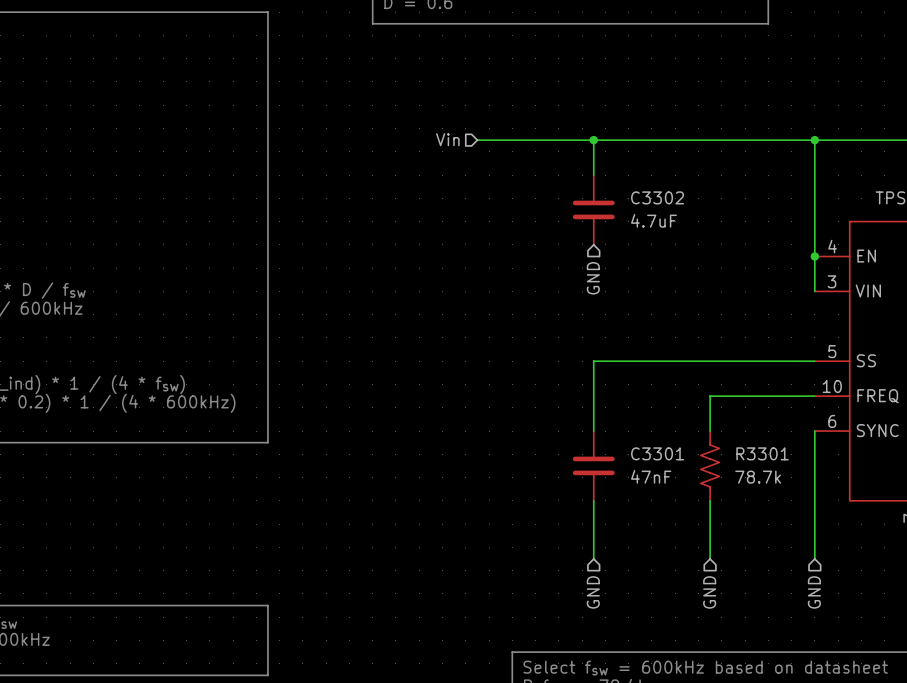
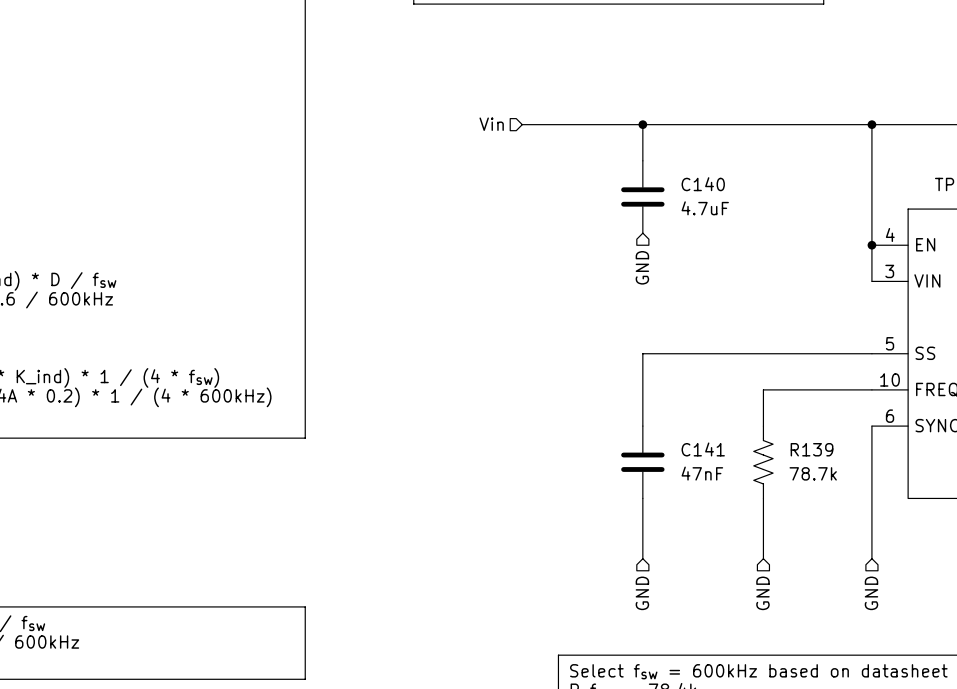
C3302 name: C3302 (657, 197) -> C140 (703, 184)
C3301 name: C3301 (657, 453) -> C141 (703, 449)
R3301 name: R3301 (762, 453) -> R139 (812, 449)

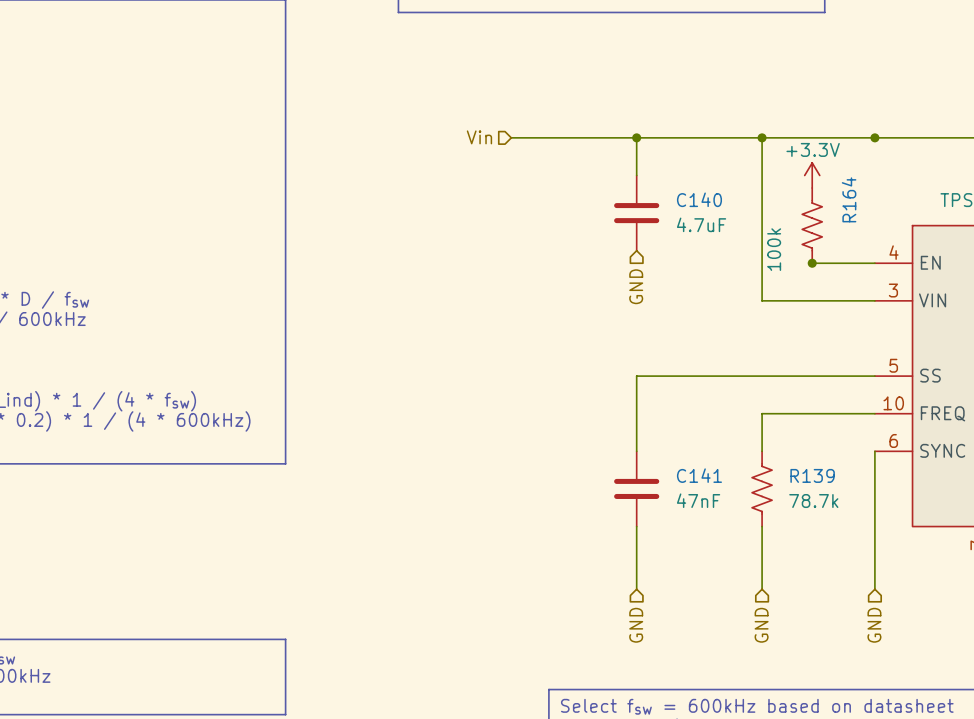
junction: none -> (762, 137)
wire: (871, 124) (871, 281) -> (762, 137) (762, 300) (874, 300)
power symbol: none -> +3.3V (812, 175)
R164: none -> 100k (812, 225)
wire: none -> (812, 263) (874, 263)
junction: none -> (812, 263)
junction: (871, 245) -> none

